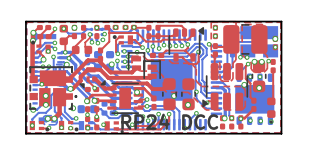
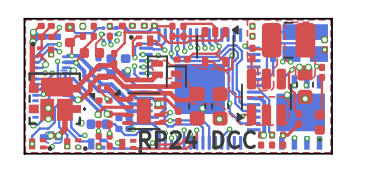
part footprint: [235, 73, 275, 126] -> [276, 75, 325, 150]

